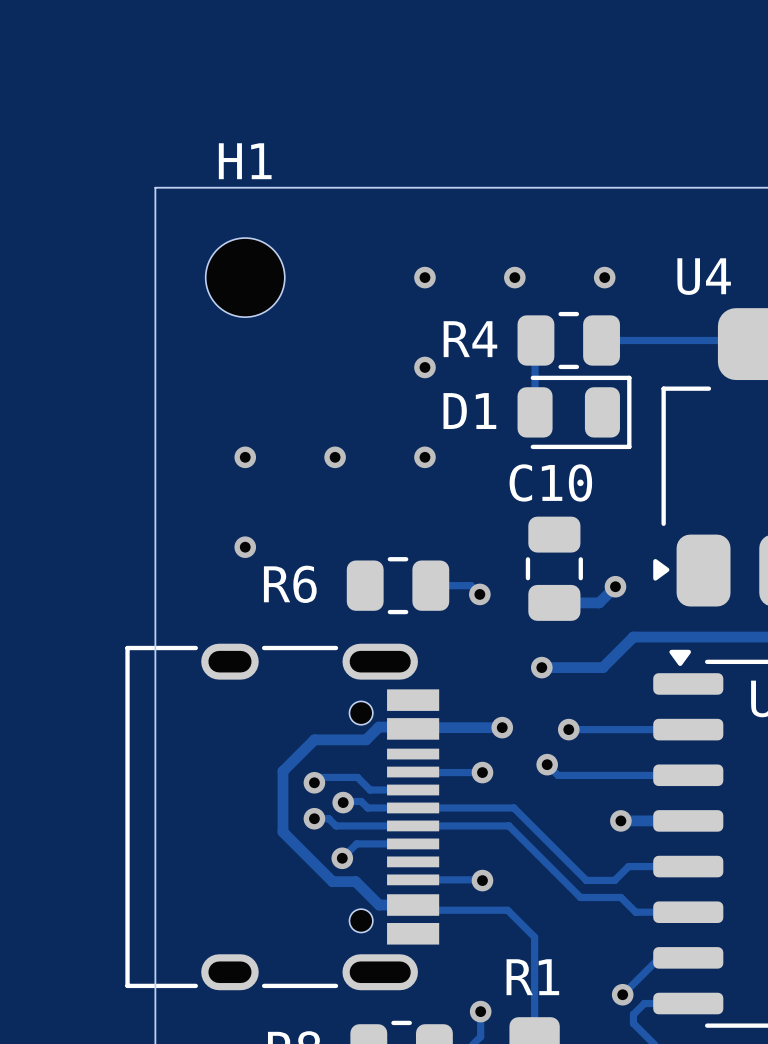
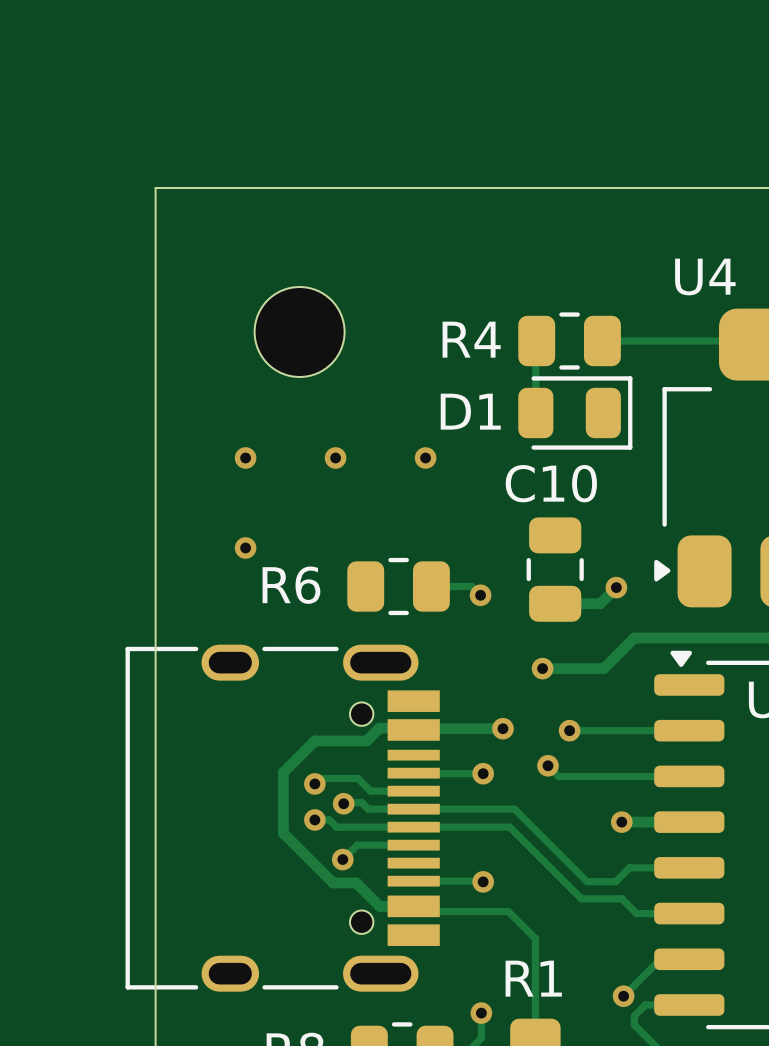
H1: (245, 277) -> none
via: (424, 277) -> none
via: (514, 277) -> none
via: (604, 277) -> none
part: none -> (299, 332)
via: (424, 367) -> none

